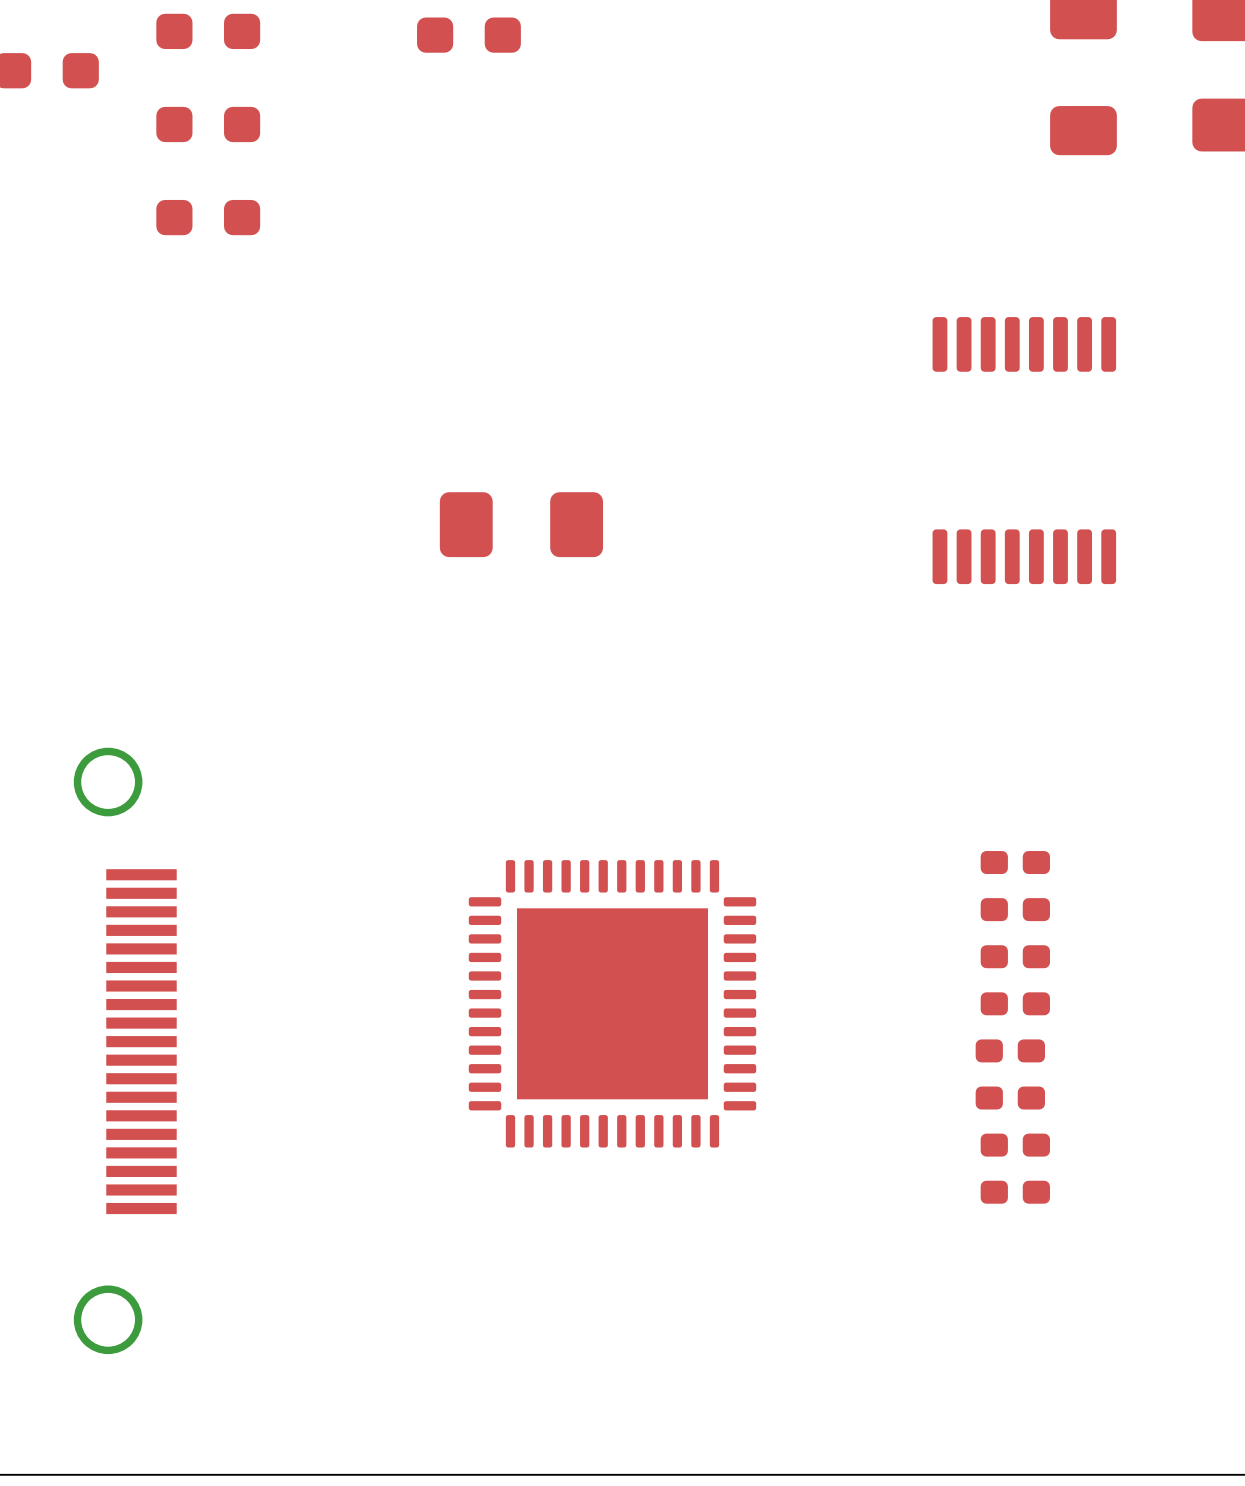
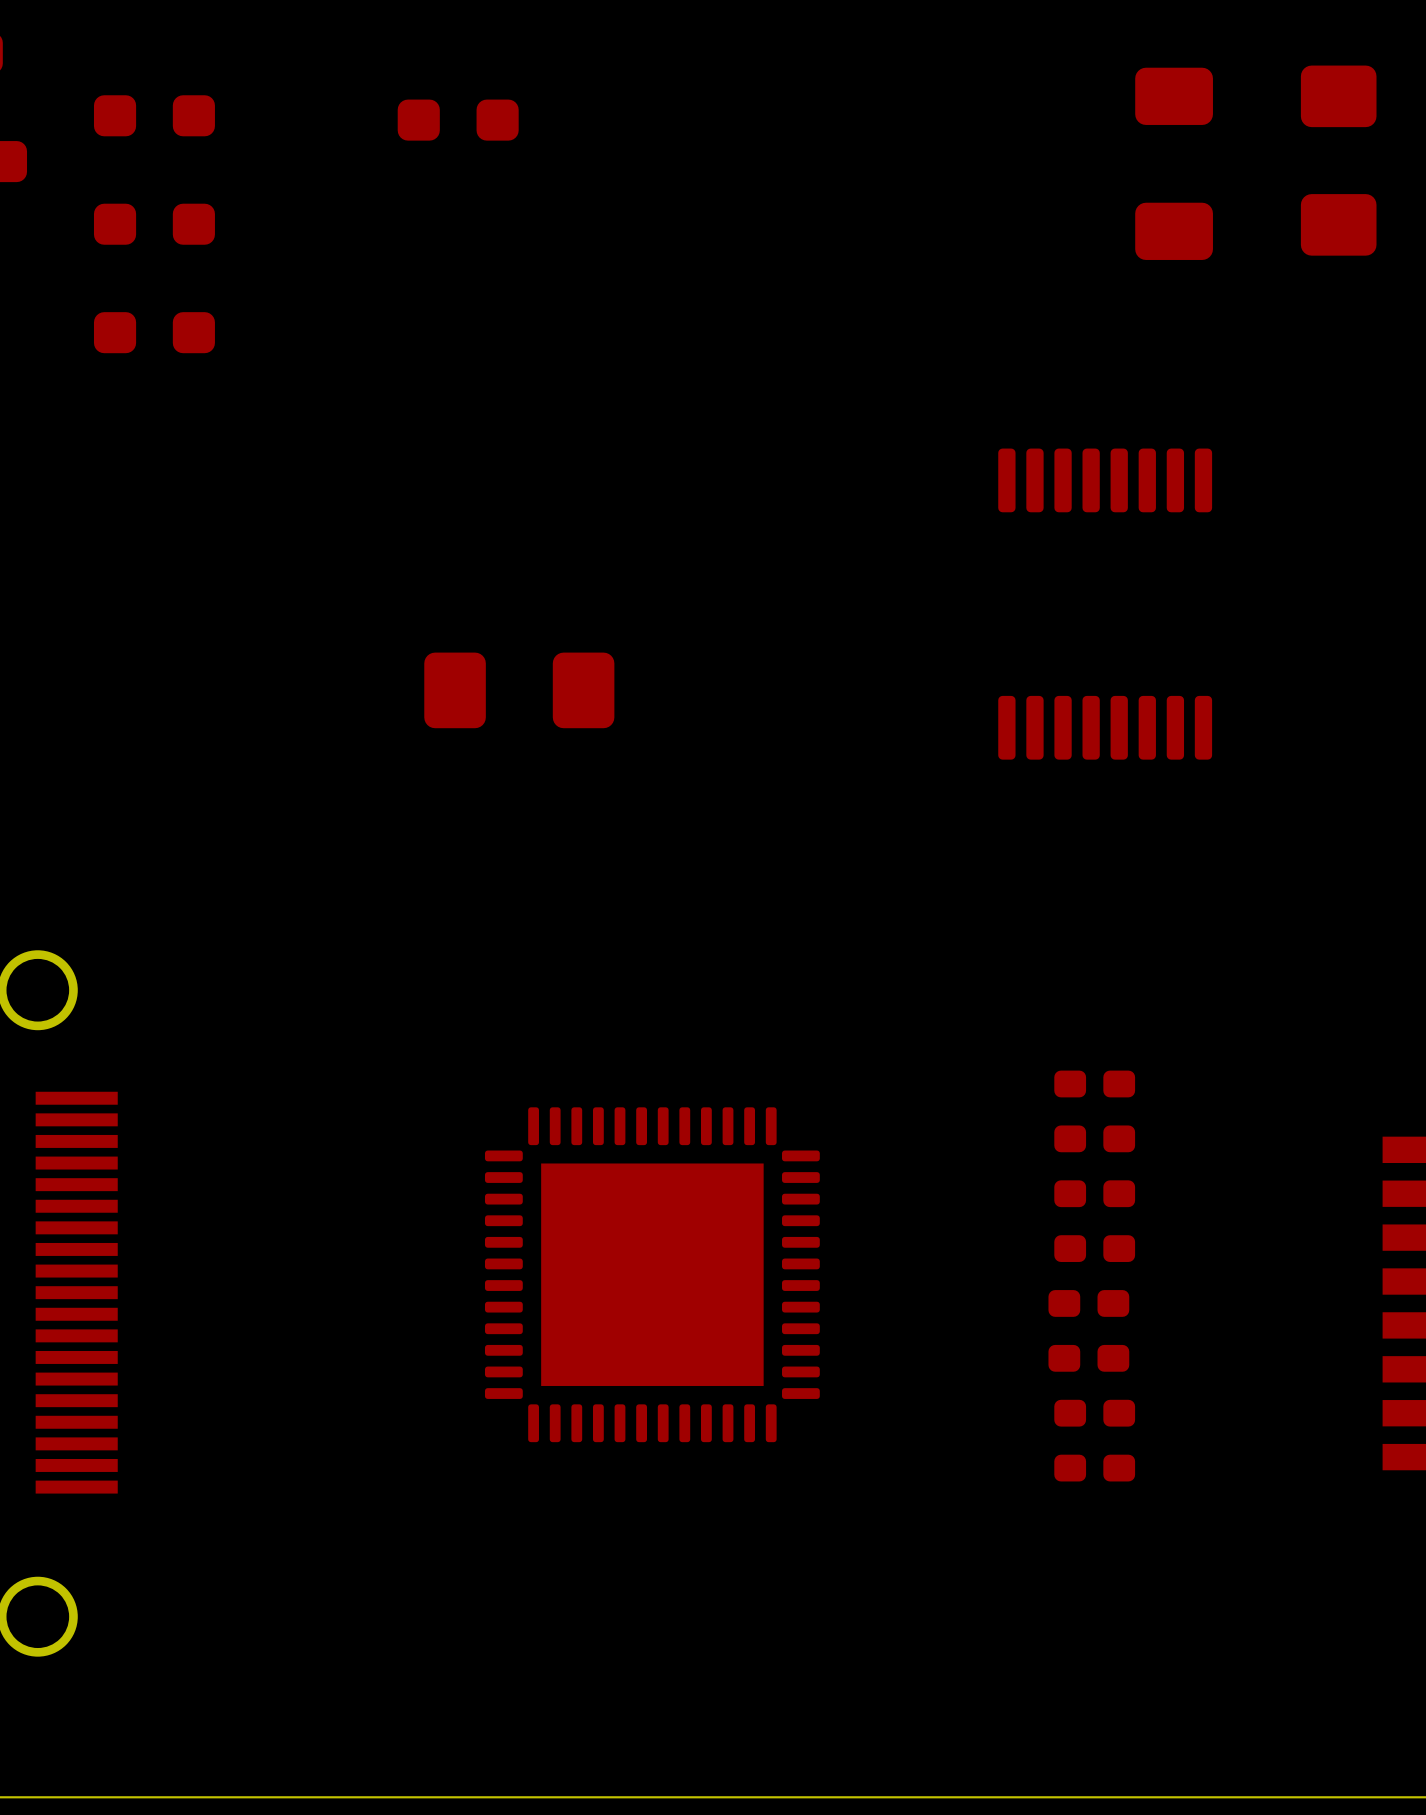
part position: (612, 1003) -> (652, 1274)

